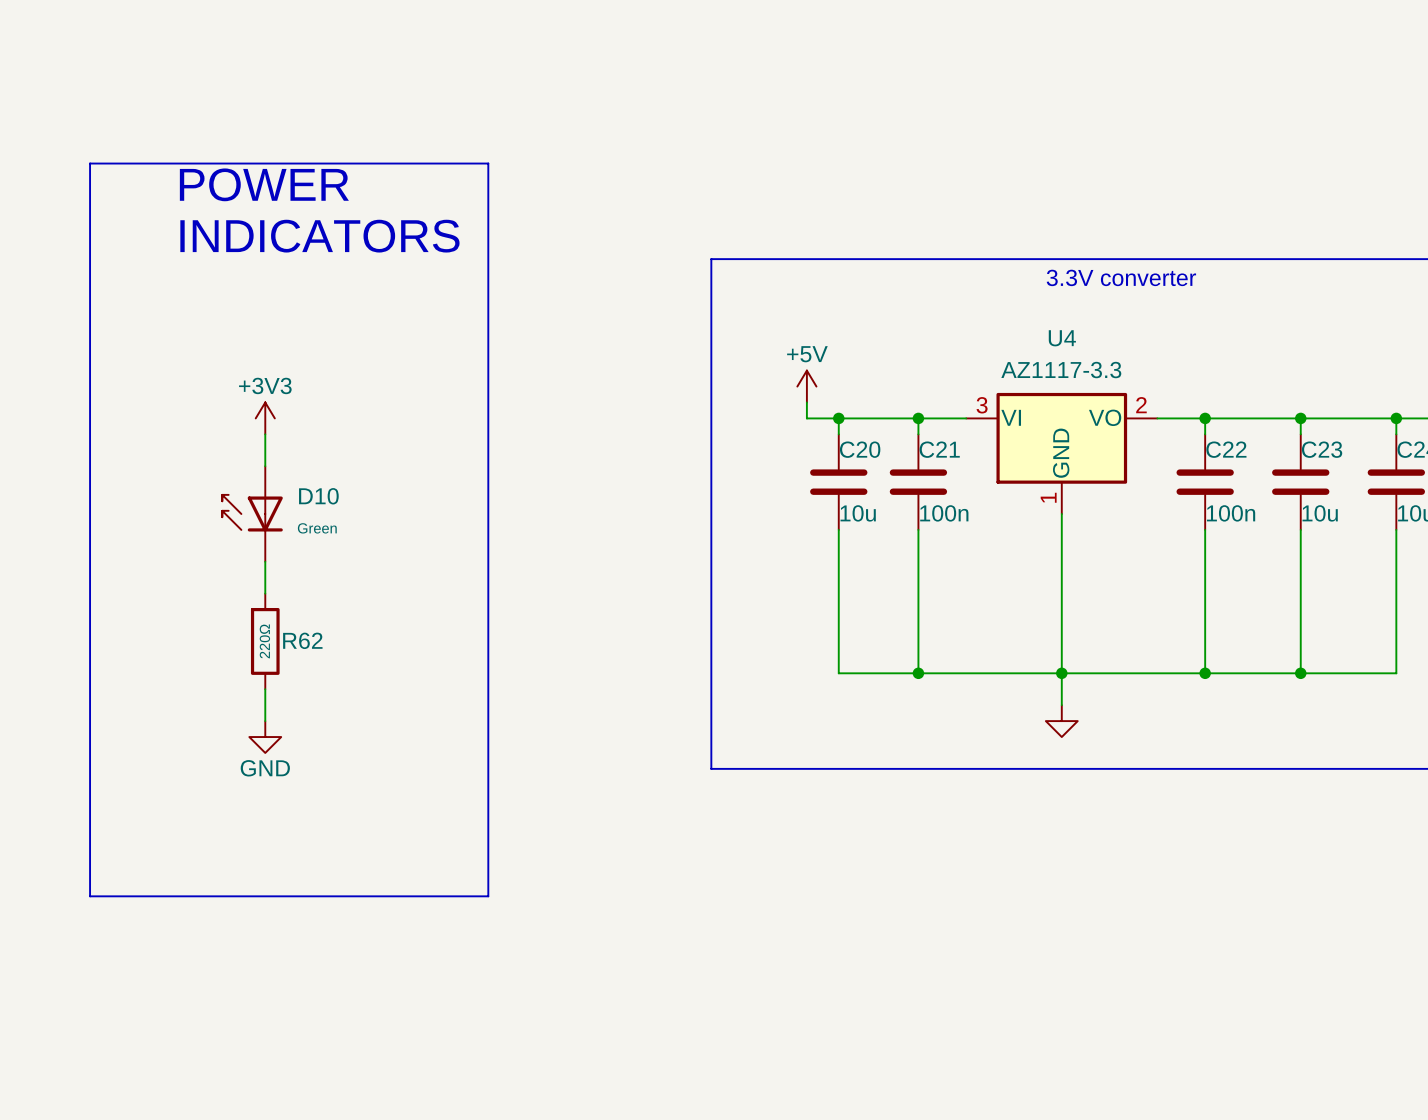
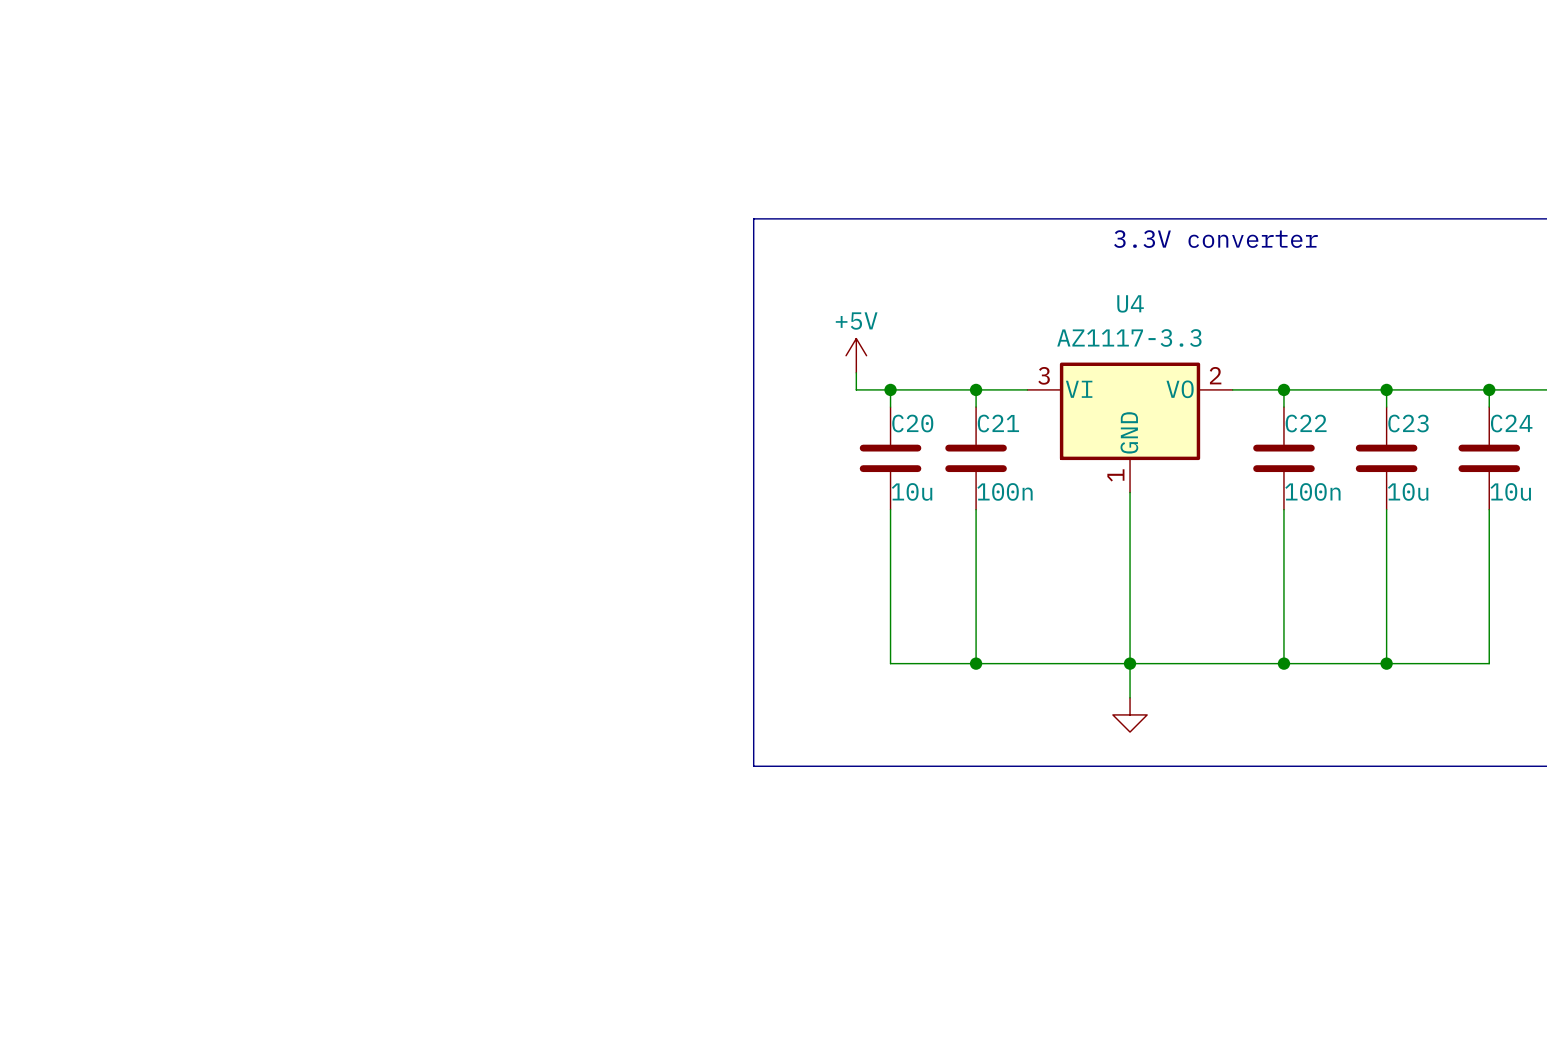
line: (90, 163) (488, 163) (488, 896) (90, 896) (90, 163) -> none
text: POWER (264, 184) -> none
text: INDICATORS (319, 236) -> none
power symbol: +3V3 (265, 418) -> none
wire: (265, 434) (265, 466) -> none
D10: Green (252, 514) -> none
wire: (265, 561) (265, 593) -> none
R62: 220Ω (265, 641) -> none
wire: (265, 689) (265, 721) -> none
power symbol: GND (265, 737) -> none

